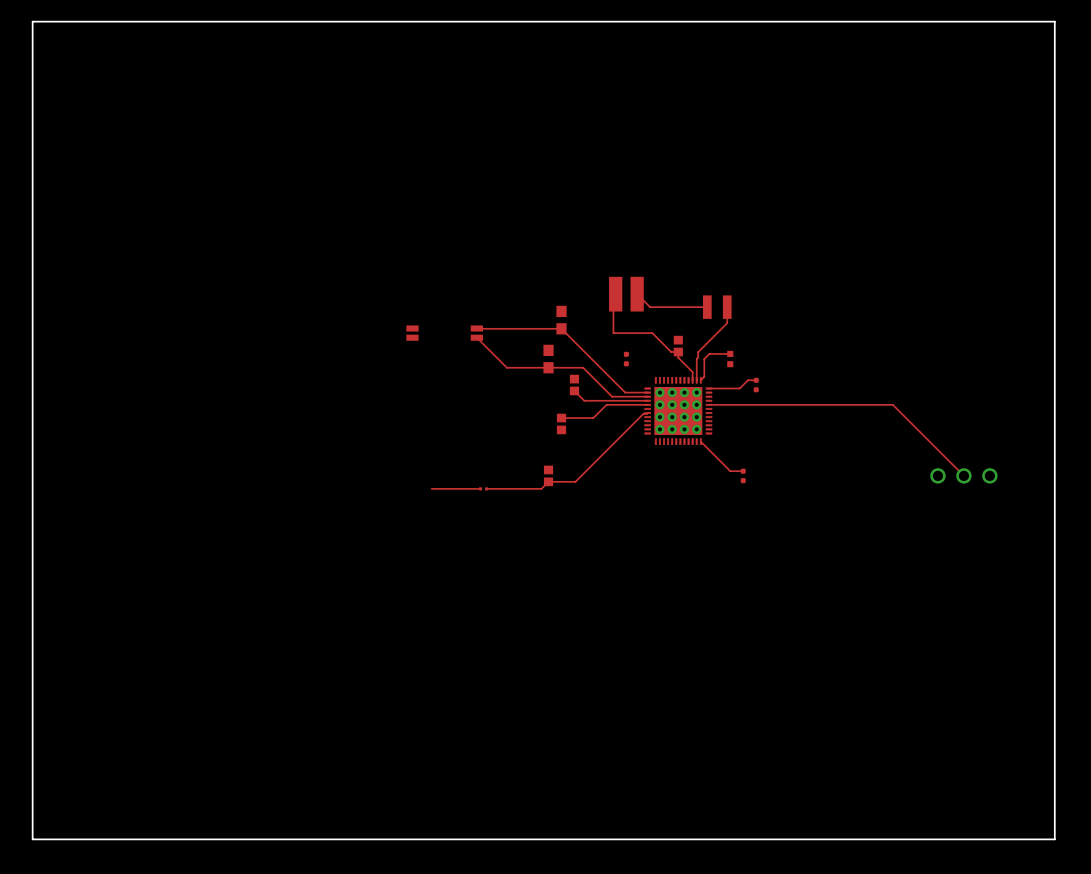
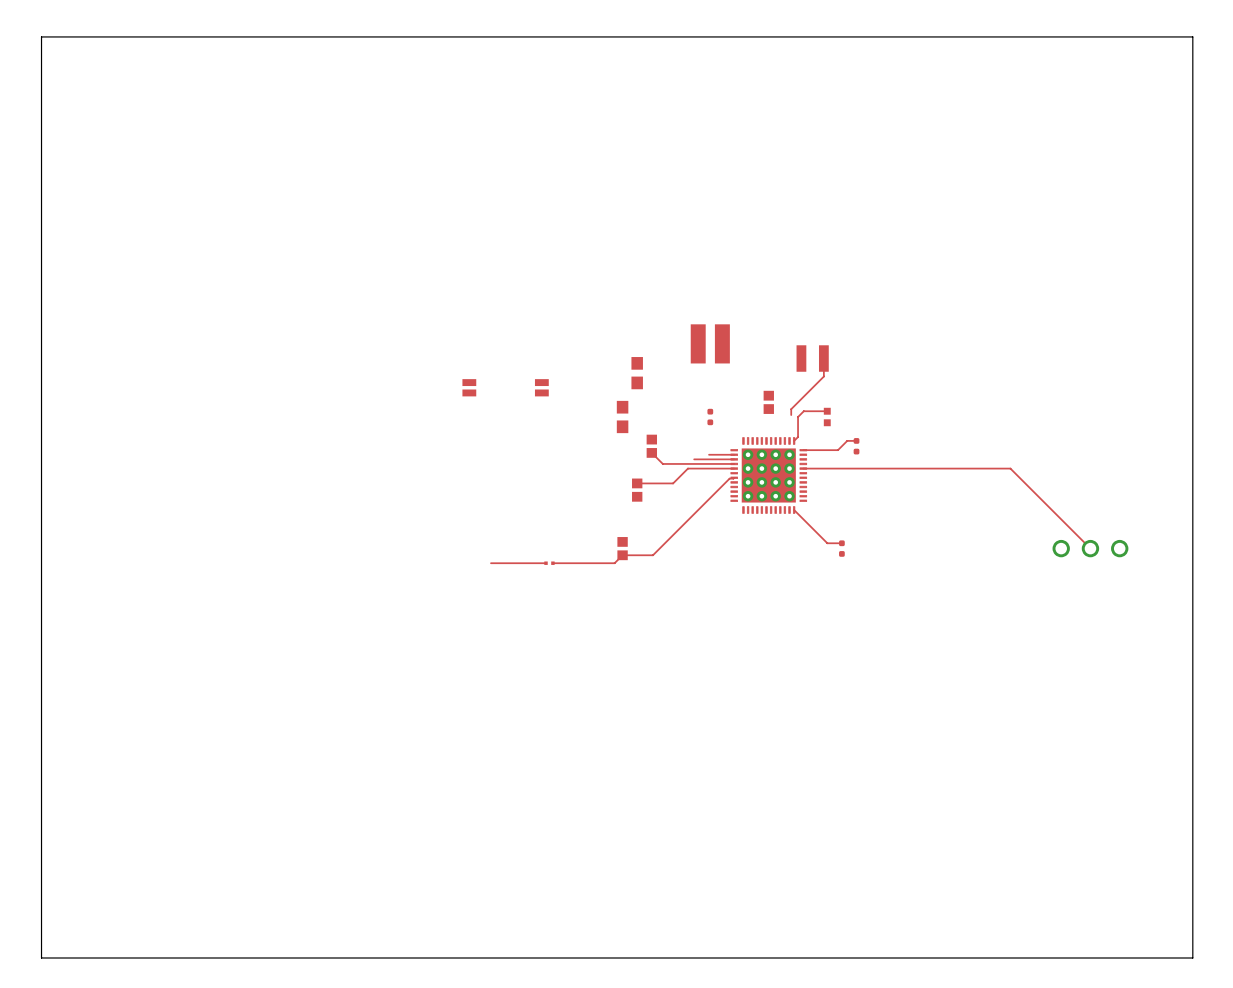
top track: (615, 294) (613, 296) (613, 333) (652, 333) (671, 352) (678, 352) (678, 357) (692, 372) (692, 380) -> none
top track: (637, 294) (650, 307) (707, 307) -> none
top track: (476, 328) (561, 328) (625, 392) -> none
top track: (476, 337) (506, 367) (583, 367) (612, 396) -> none
top track: (698, 357) (697, 379) -> none

